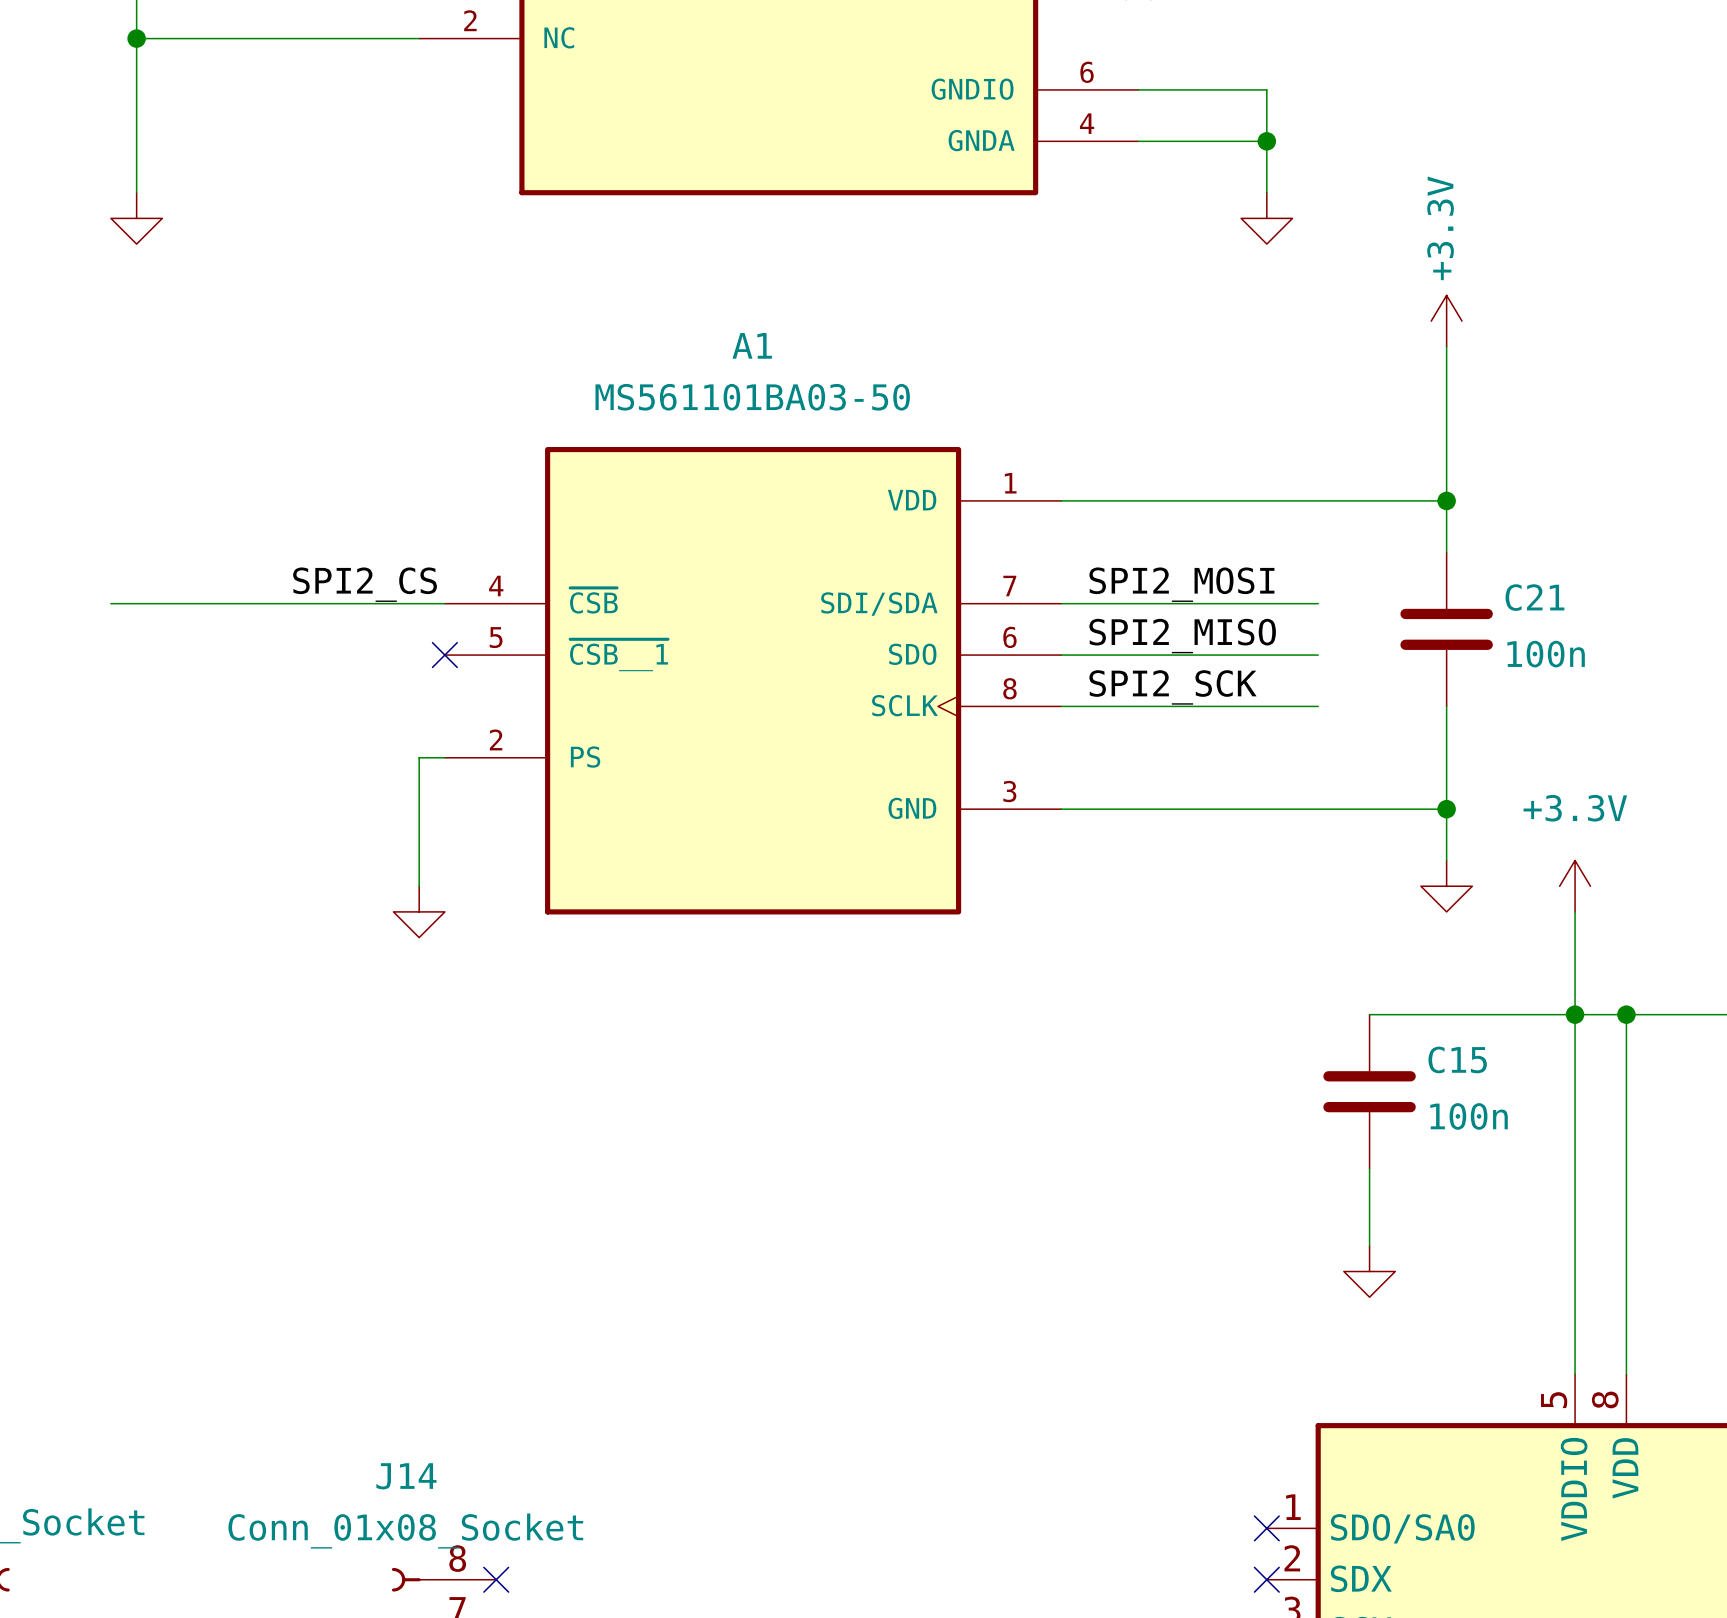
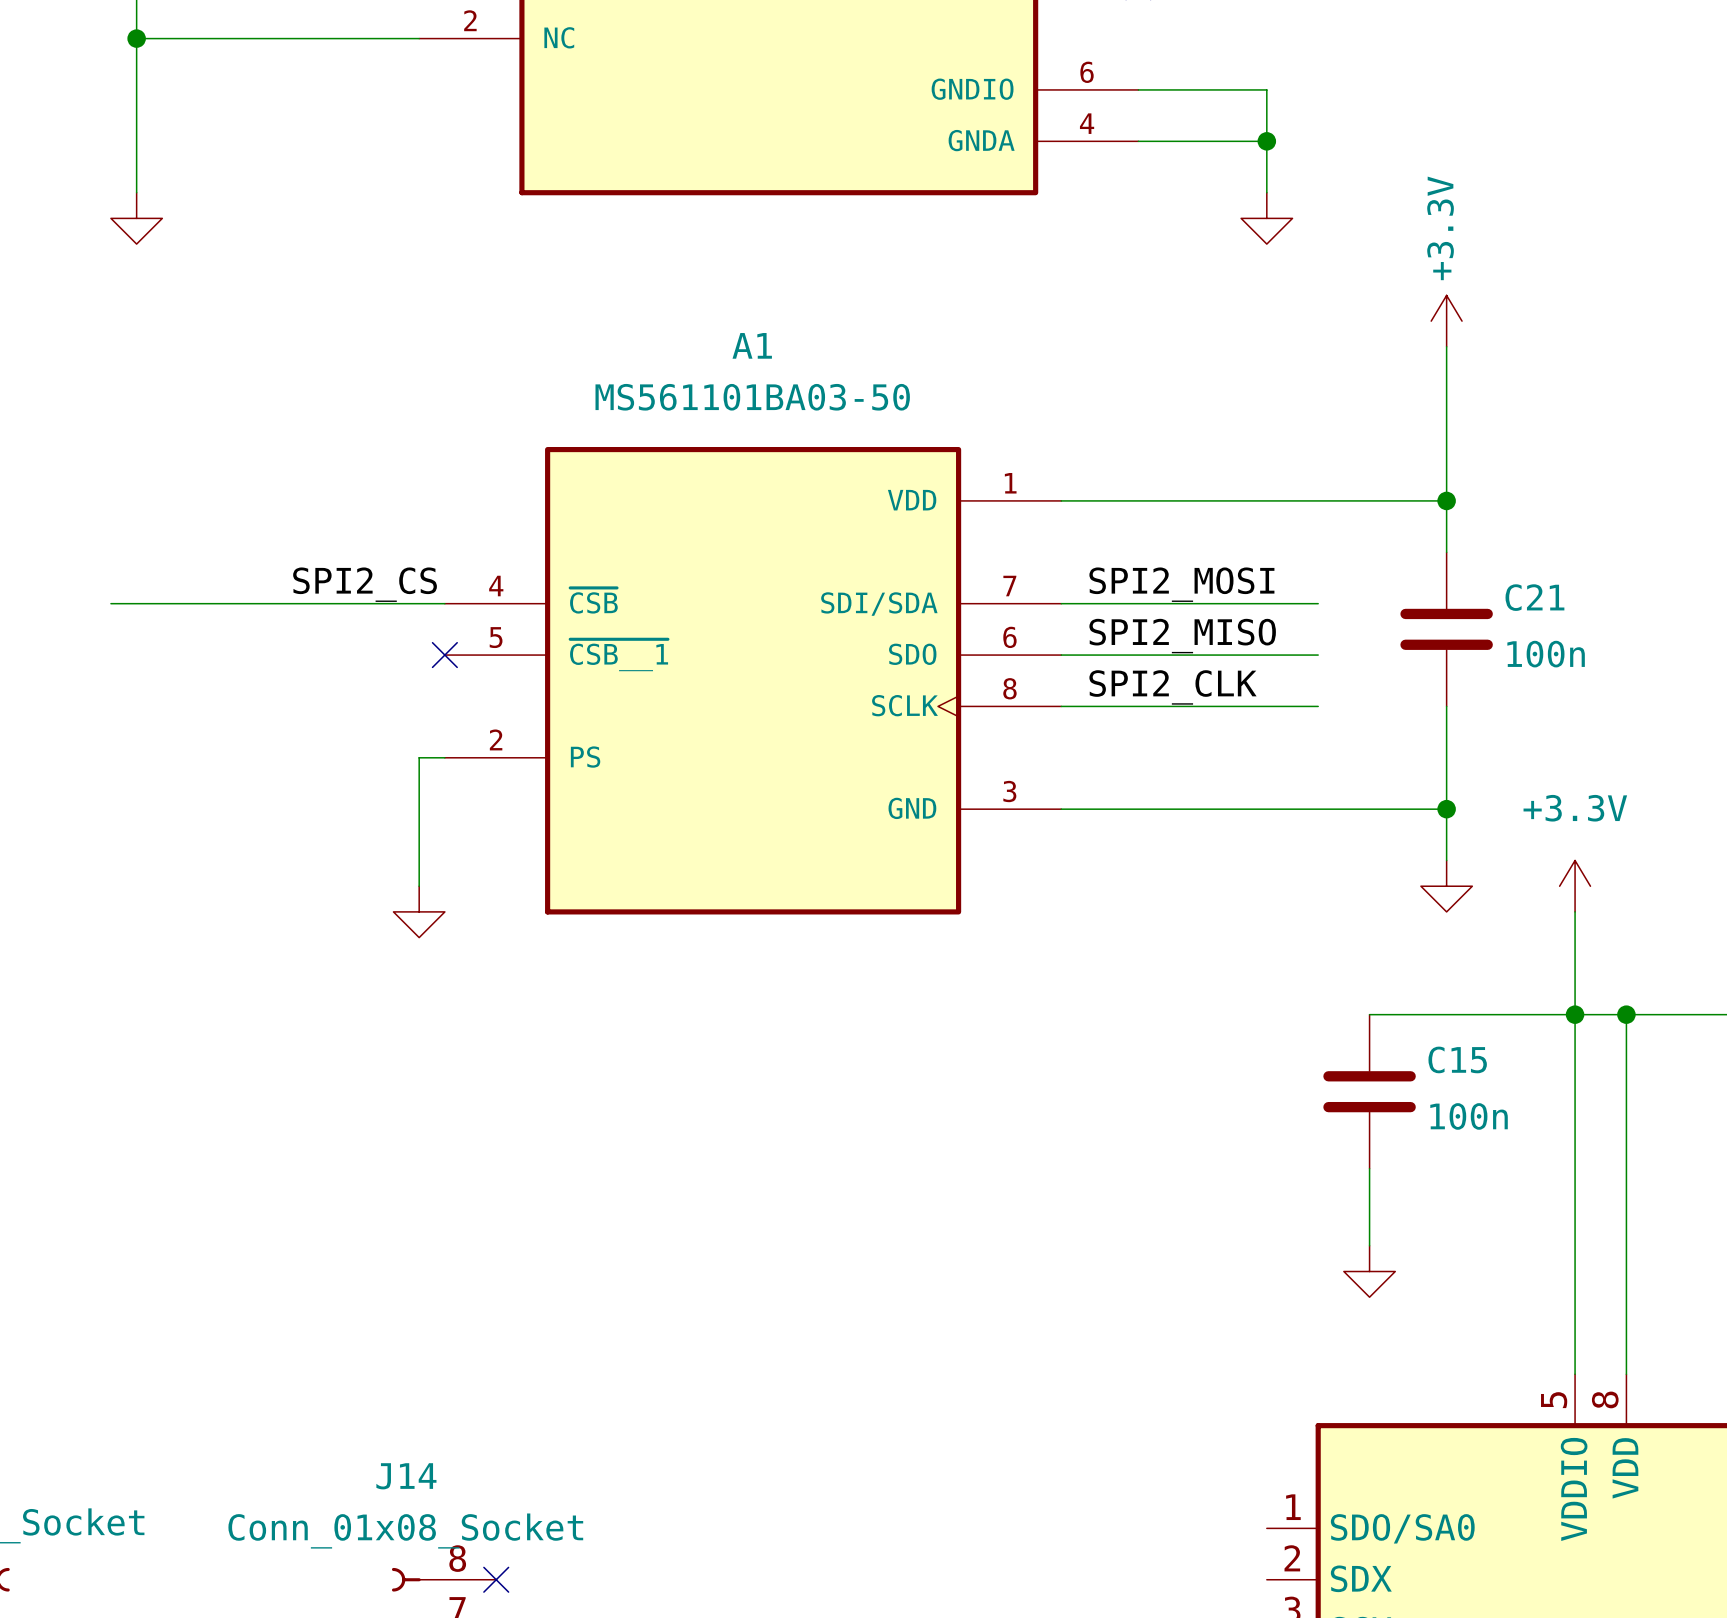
label: SPI2_SCK (1172, 687) -> SPI2_CLK (1172, 687)
no-connect mark: (1266, 1528) -> none
no-connect mark: (1266, 1579) -> none

